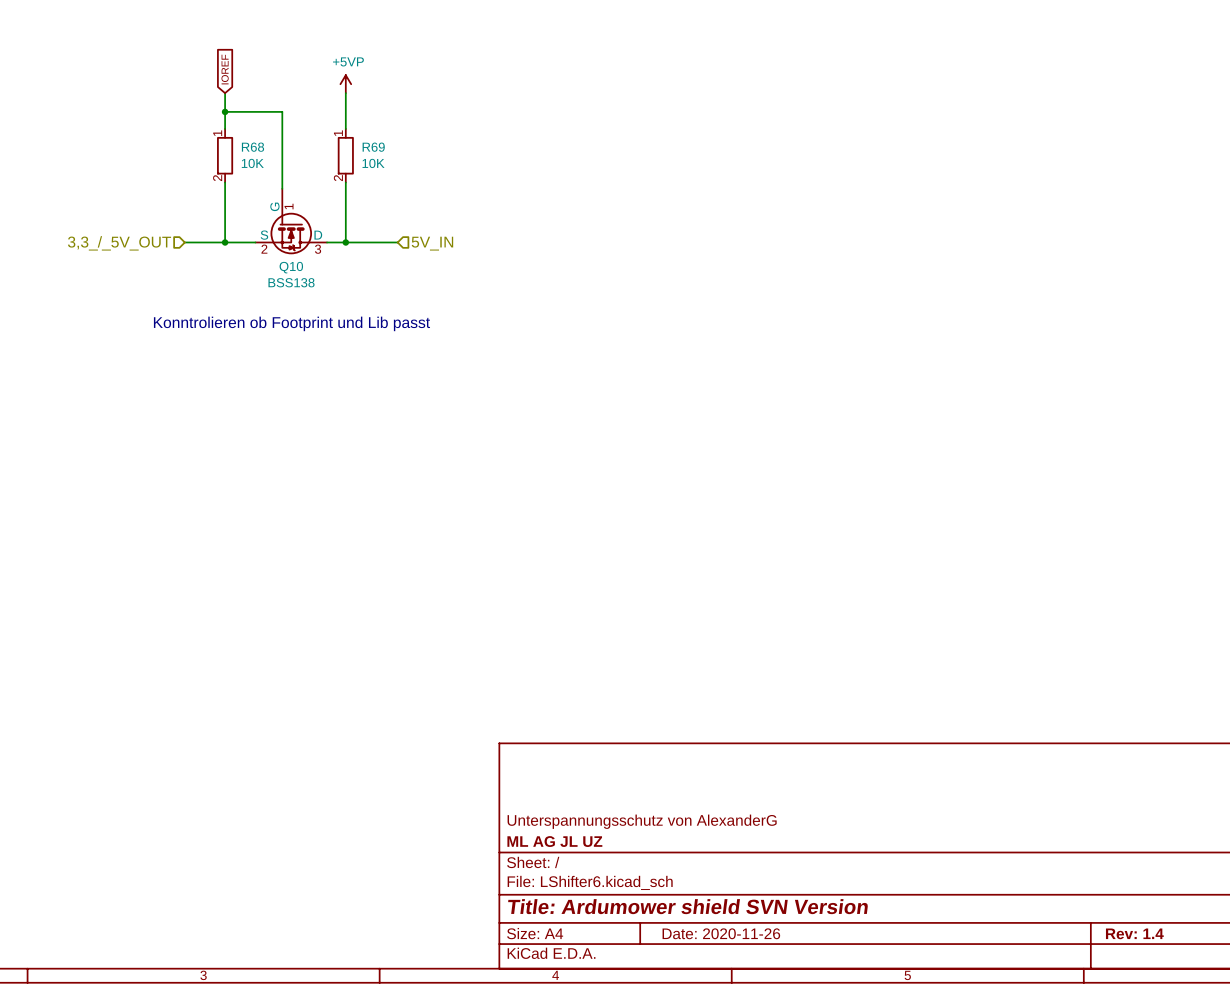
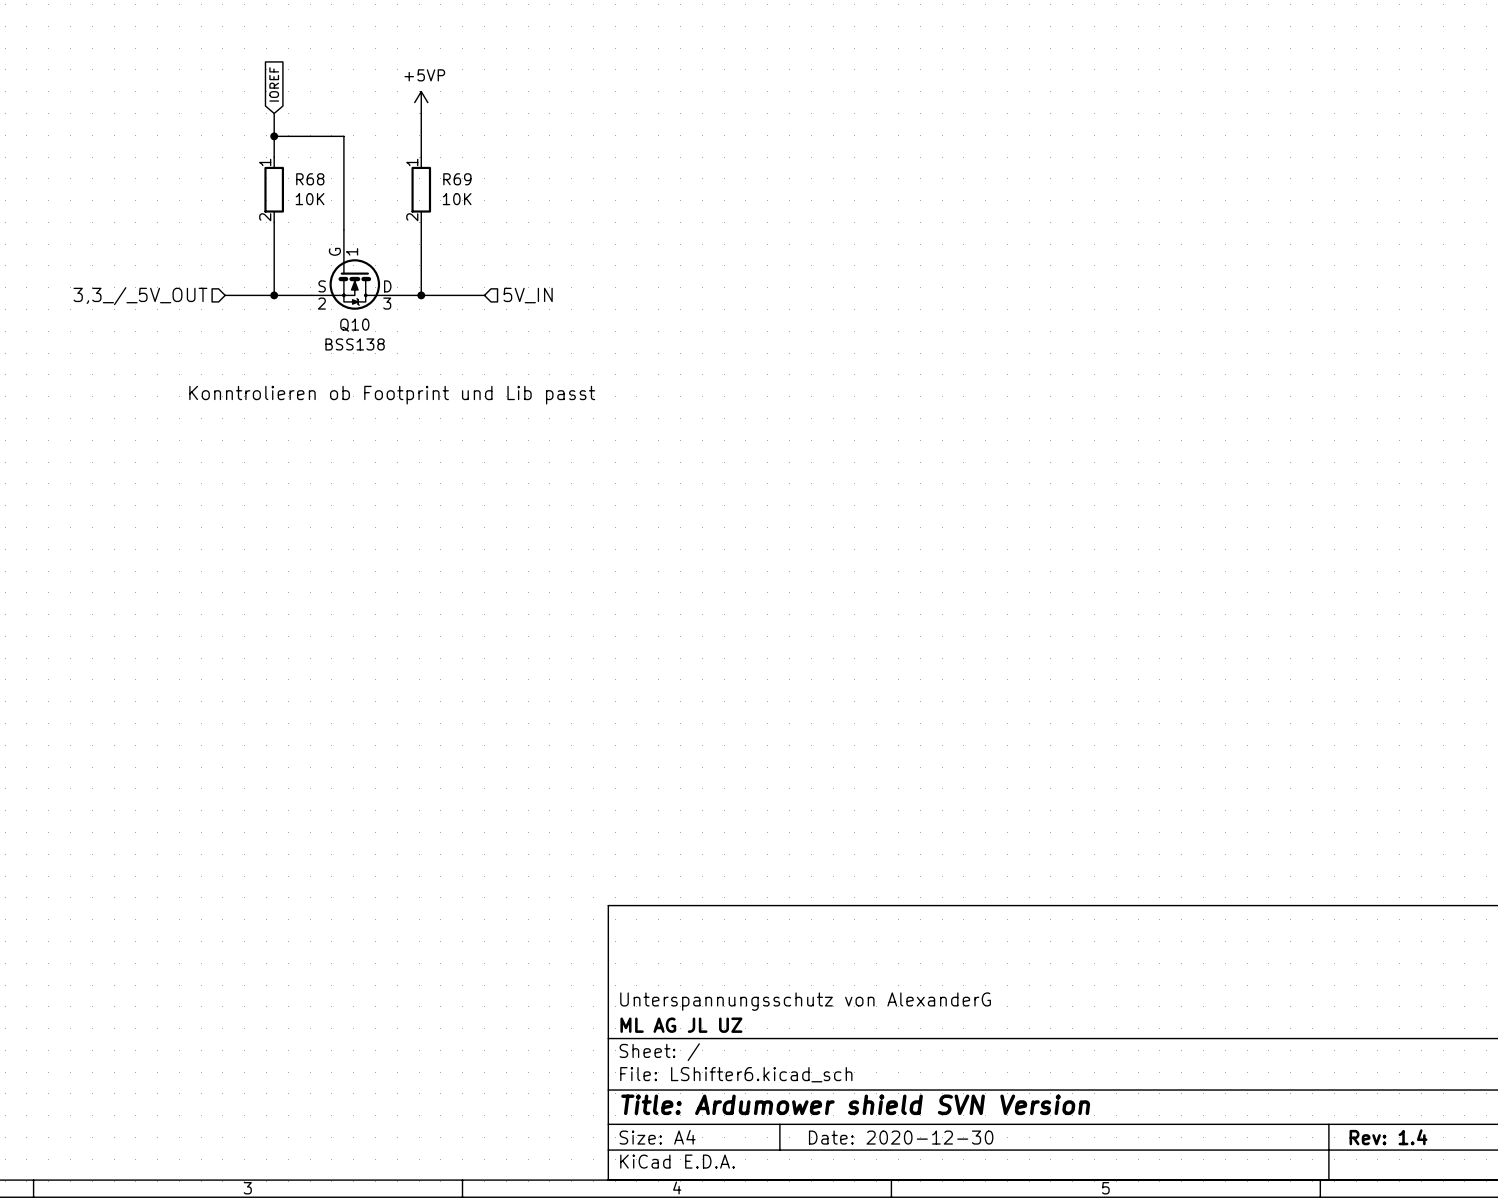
title block: Date: 2020-11-26 (721, 933) -> Date: 2020-12-30 (901, 1137)

